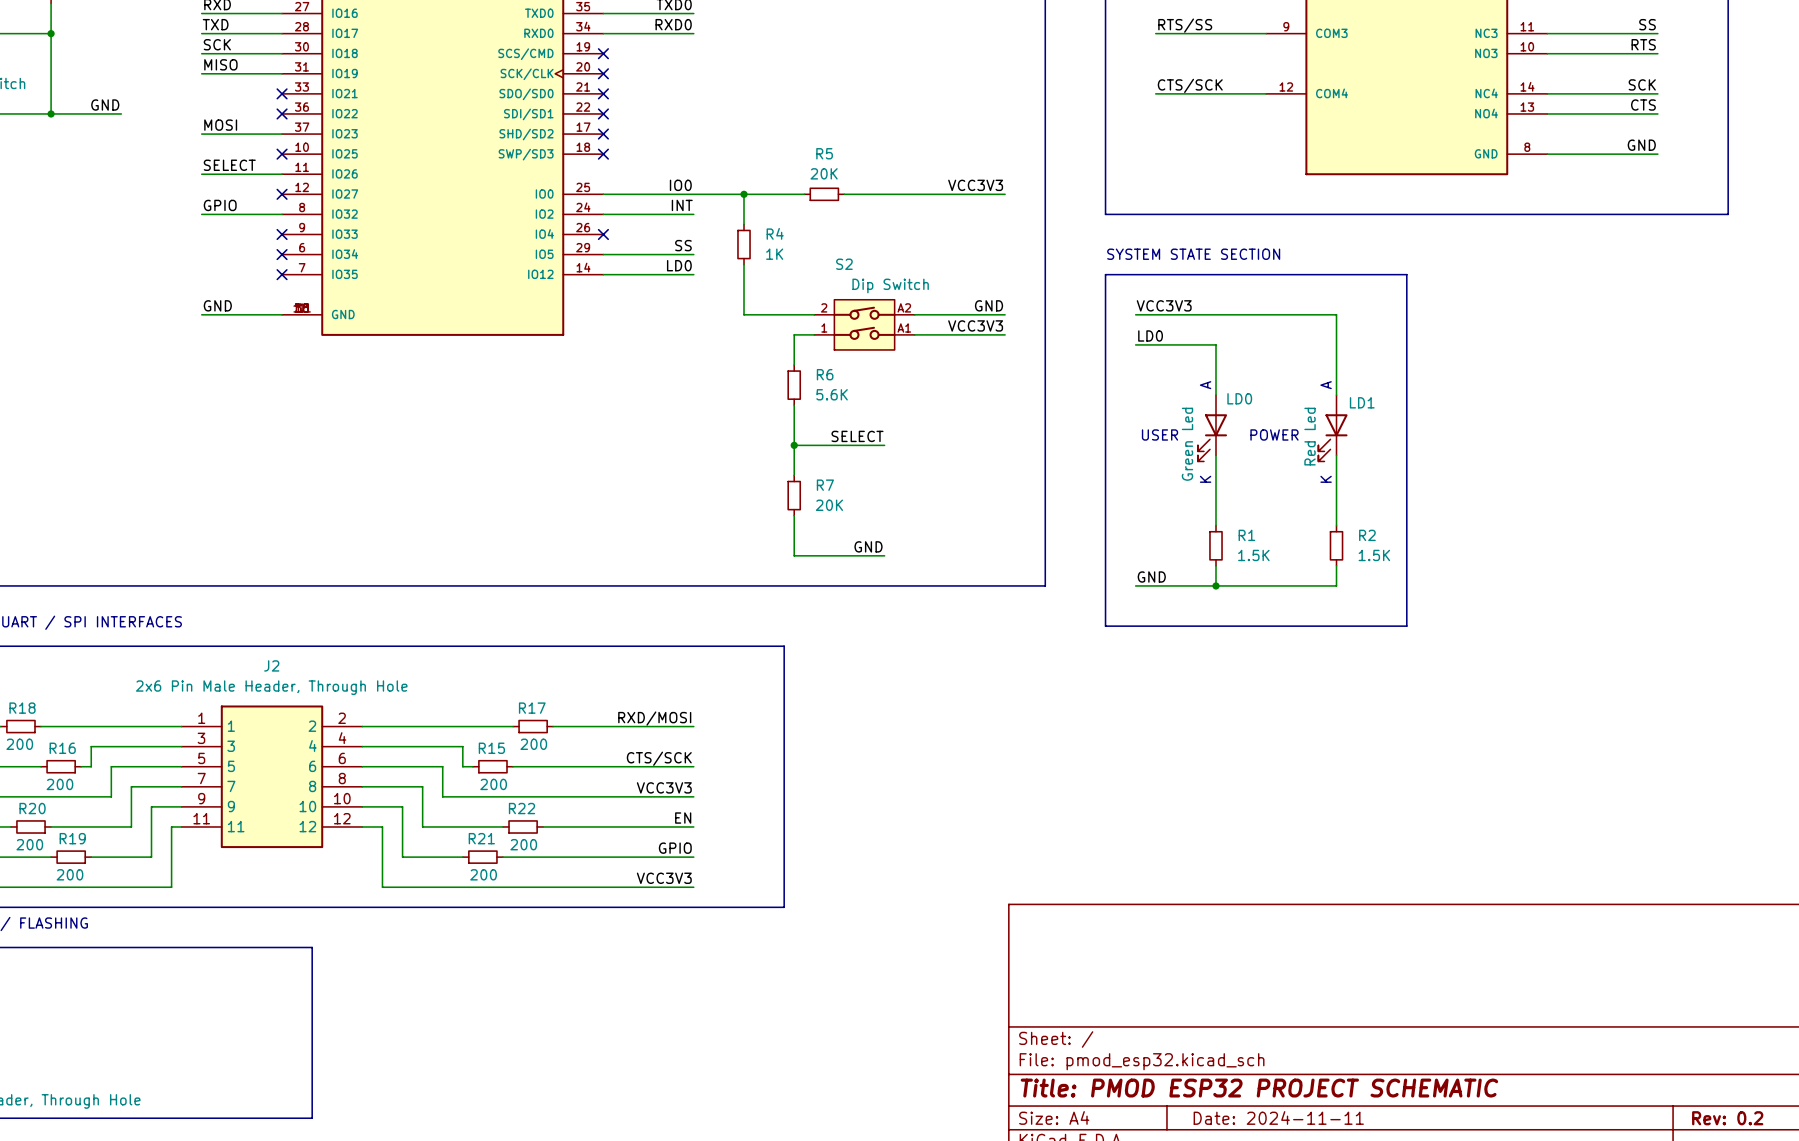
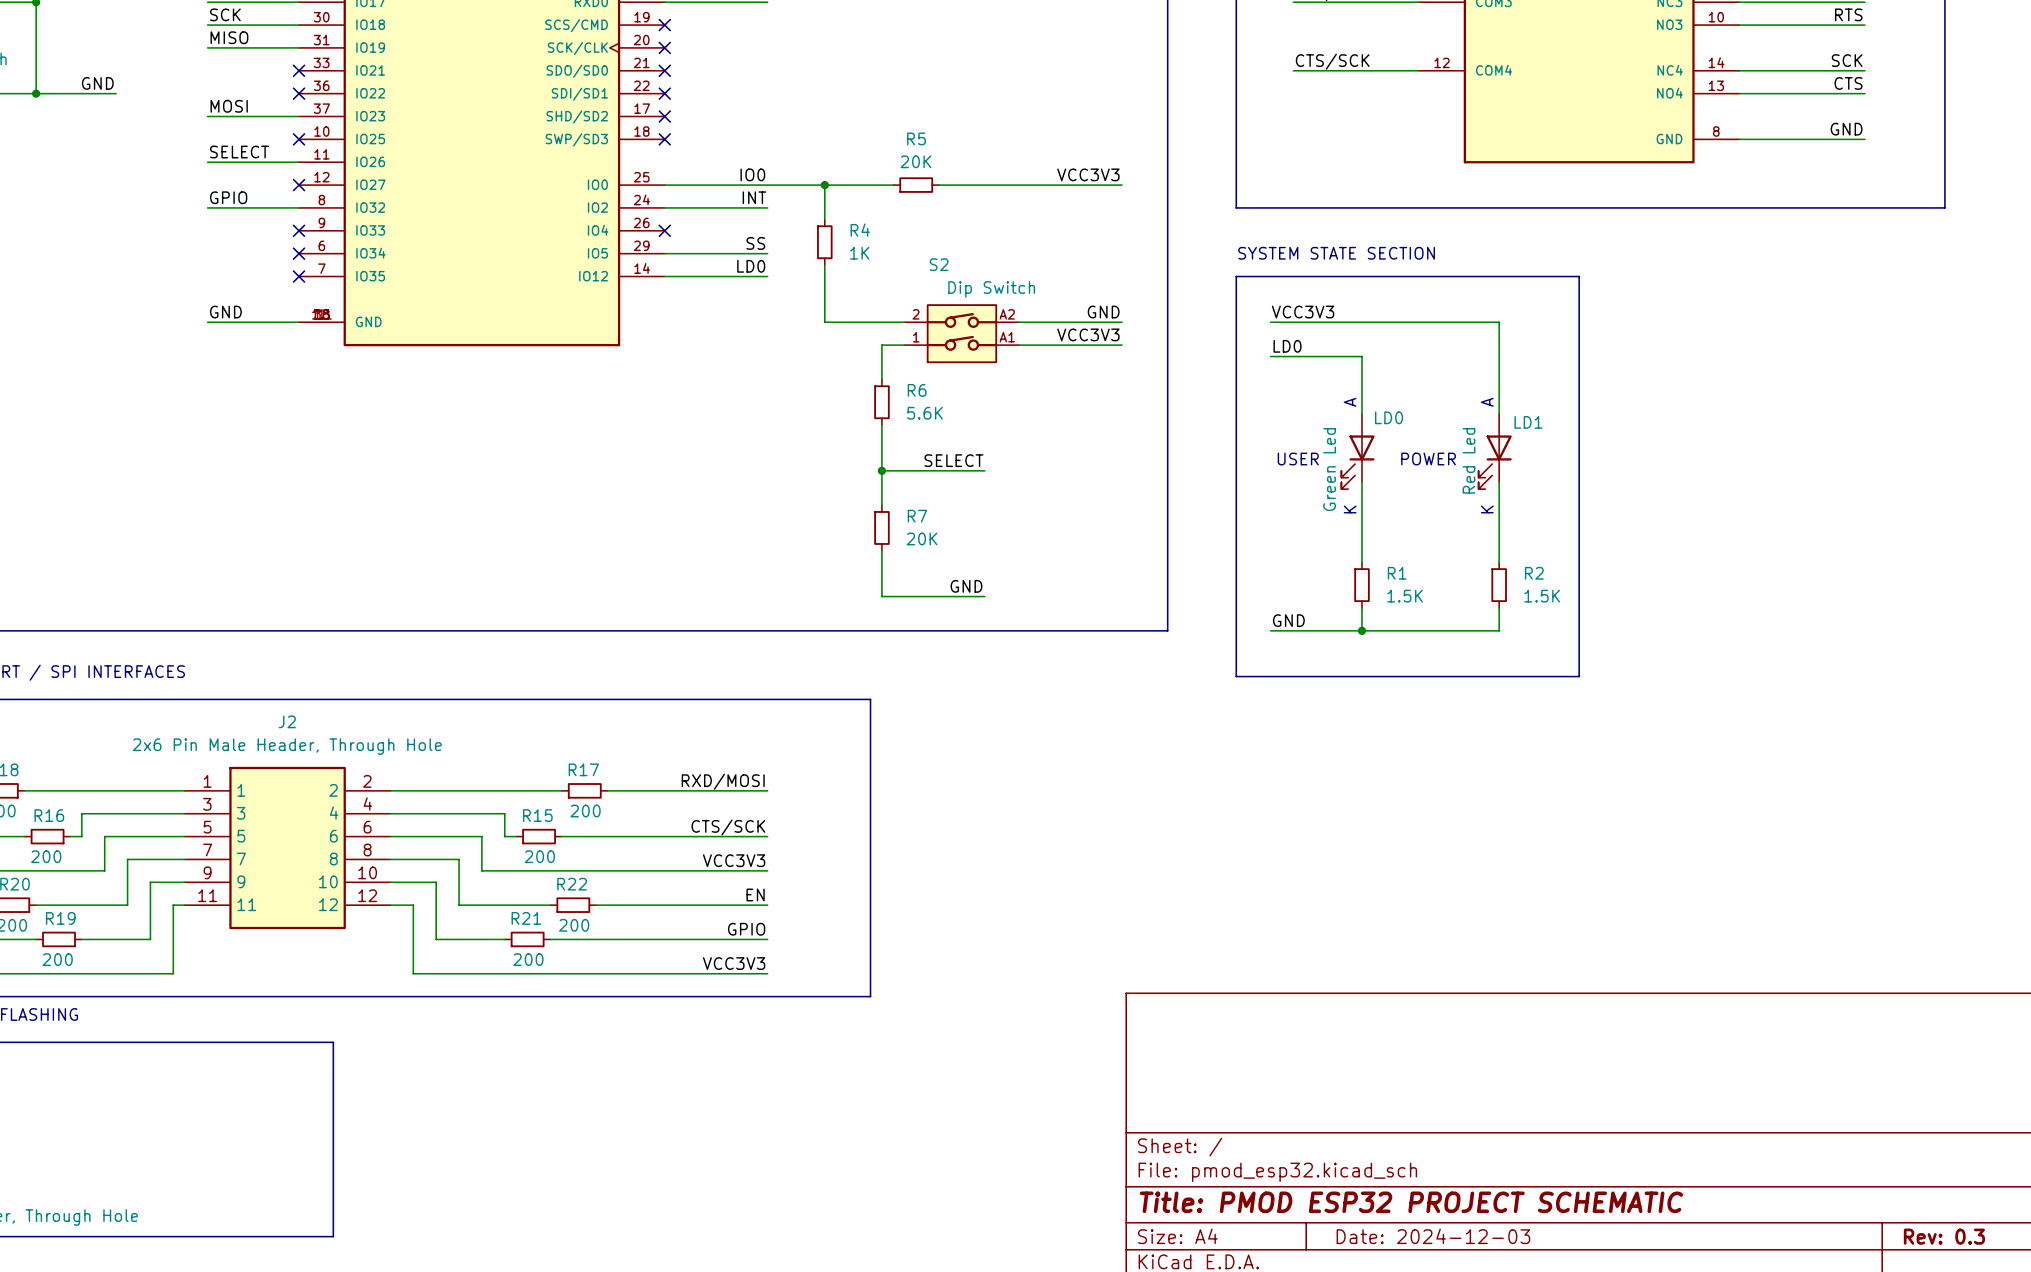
title block: Date: 2024-11-11 (1278, 1117) -> Date: 2024-12-03 (1433, 1236)
title block: Rev: 0.2 (1727, 1118) -> Rev: 0.3 (1944, 1236)

